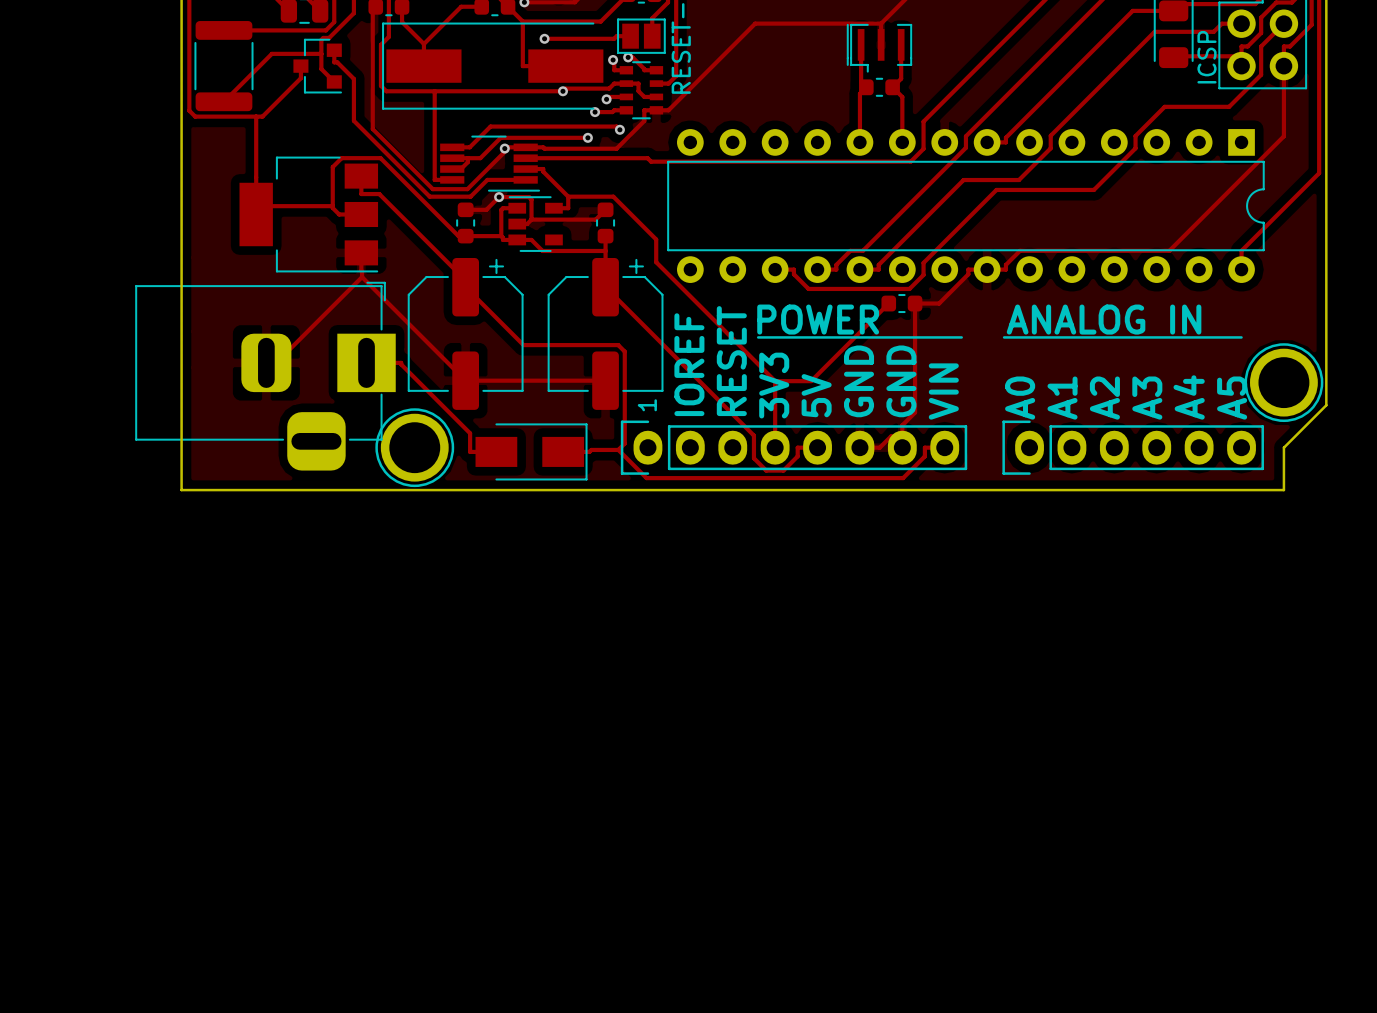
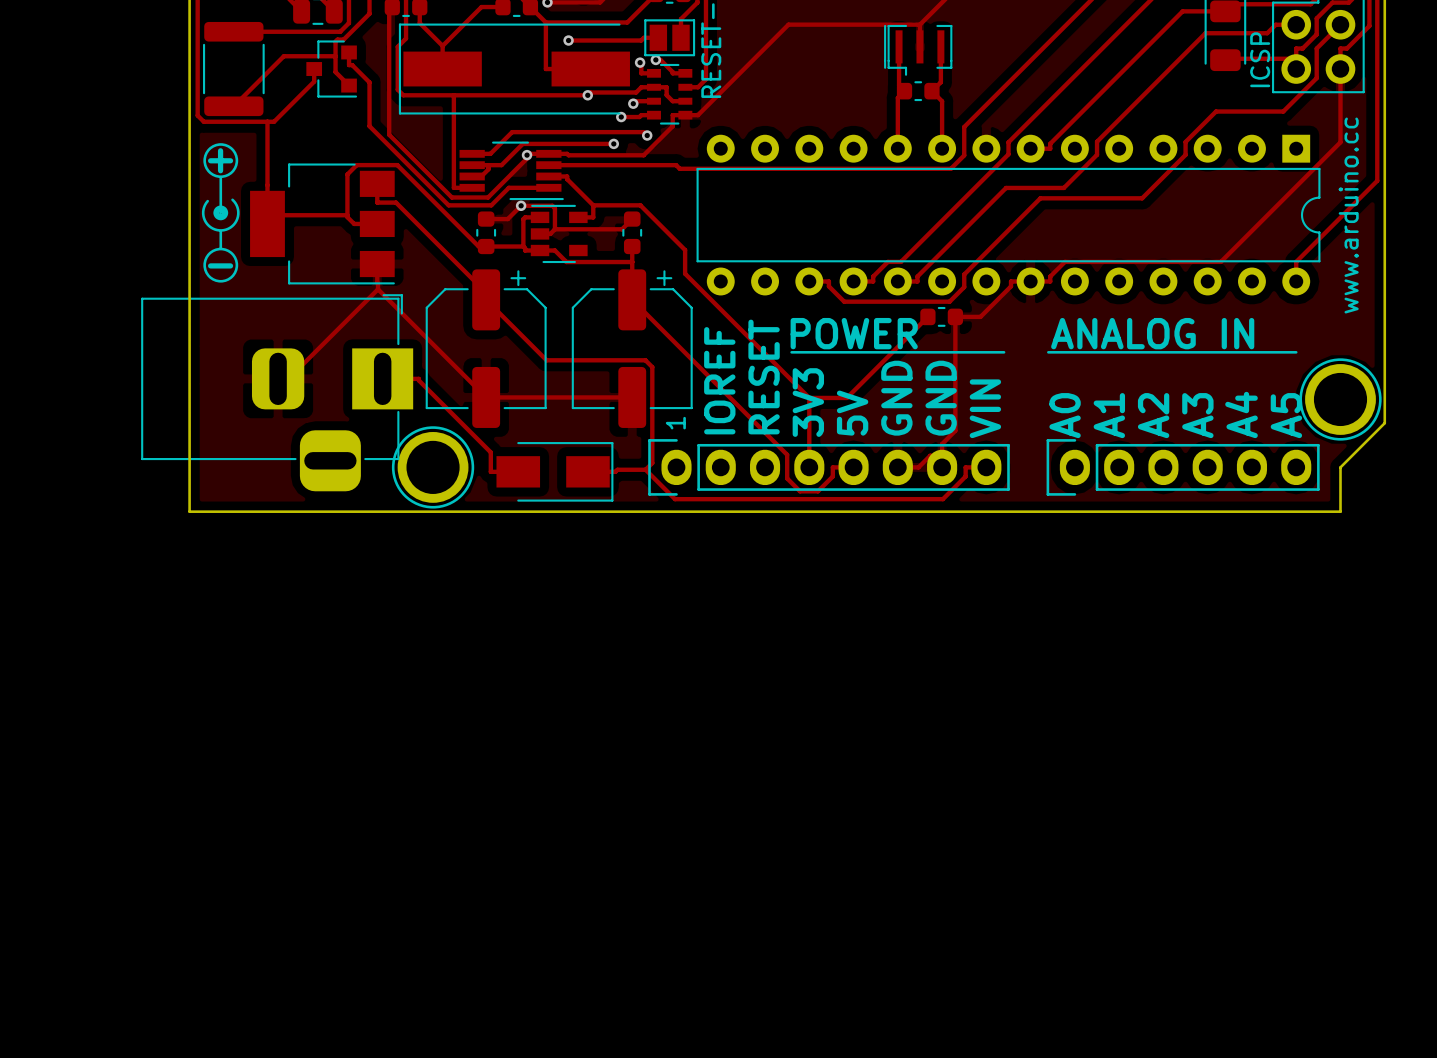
drawing: none -> [201, 143, 240, 283]
text: none -> + (220, 160)
text: none -> www.arduino.cc (1348, 215)
text: none -> - (220, 265)

